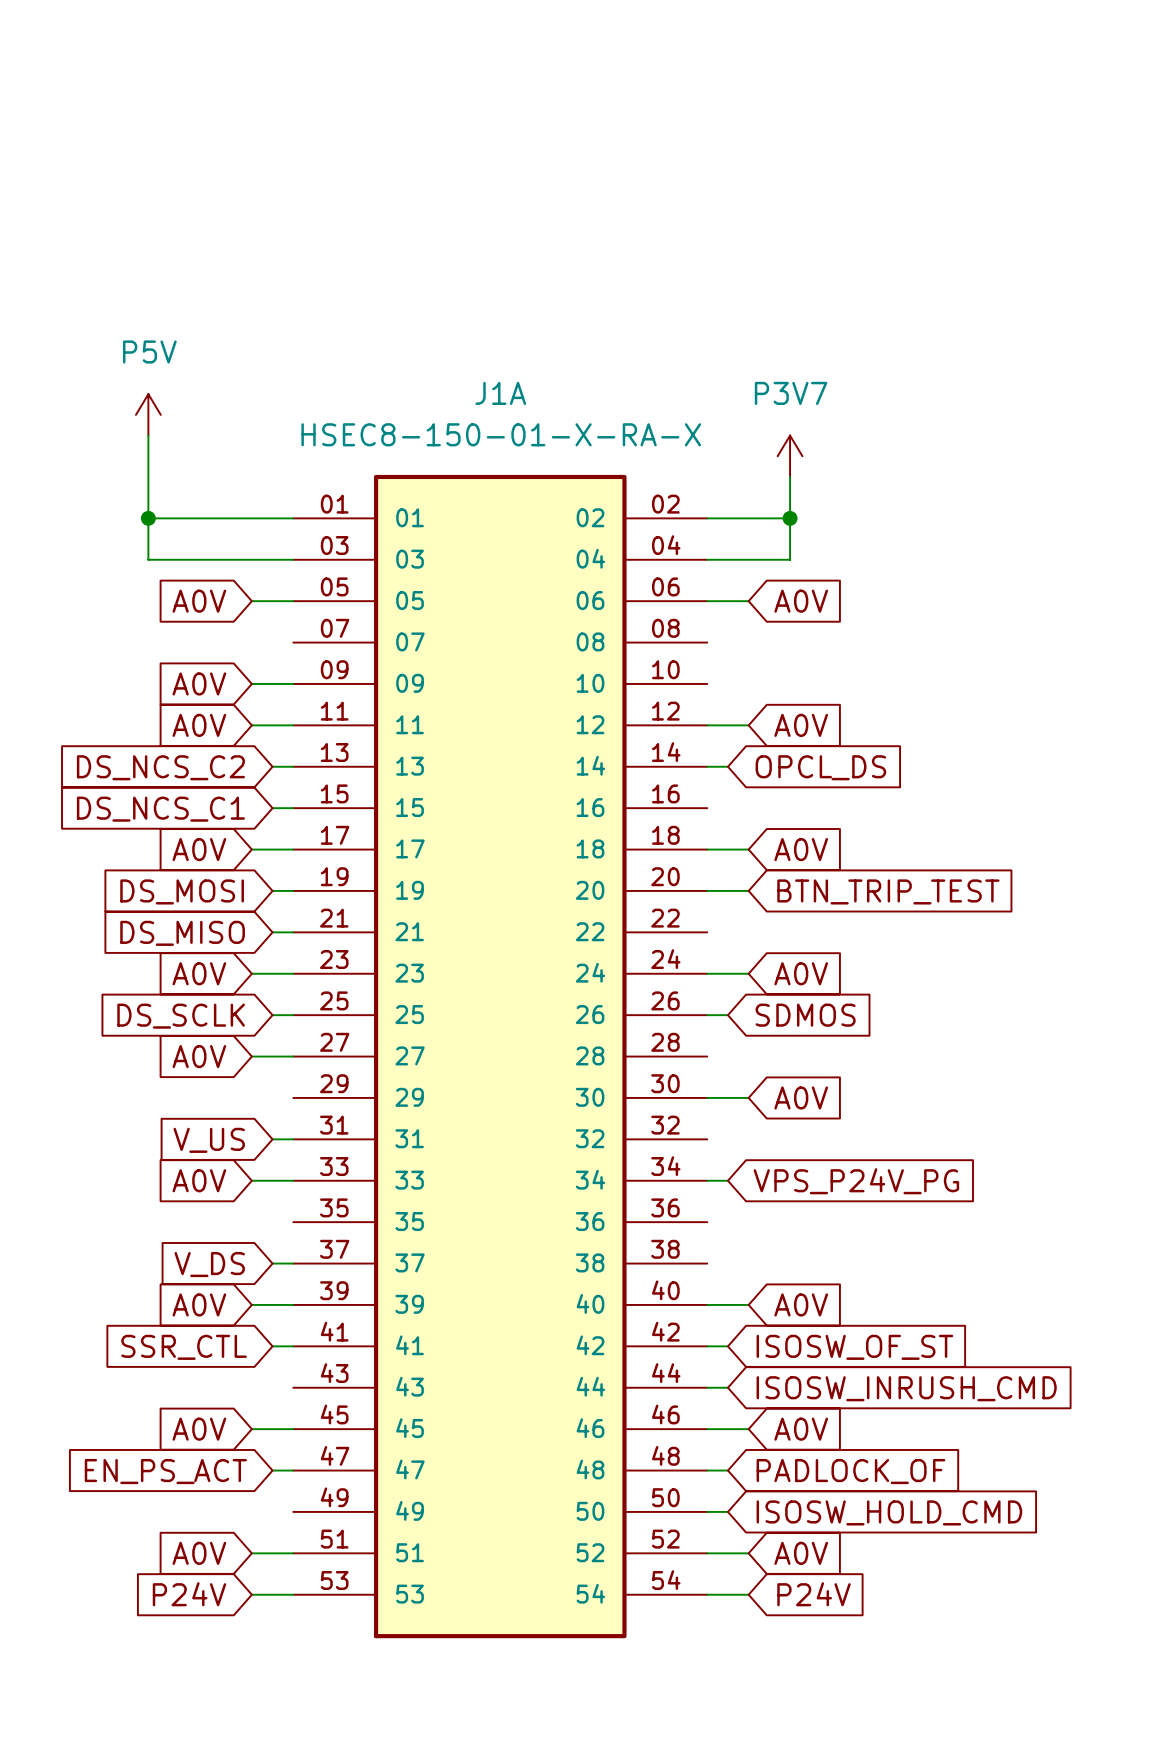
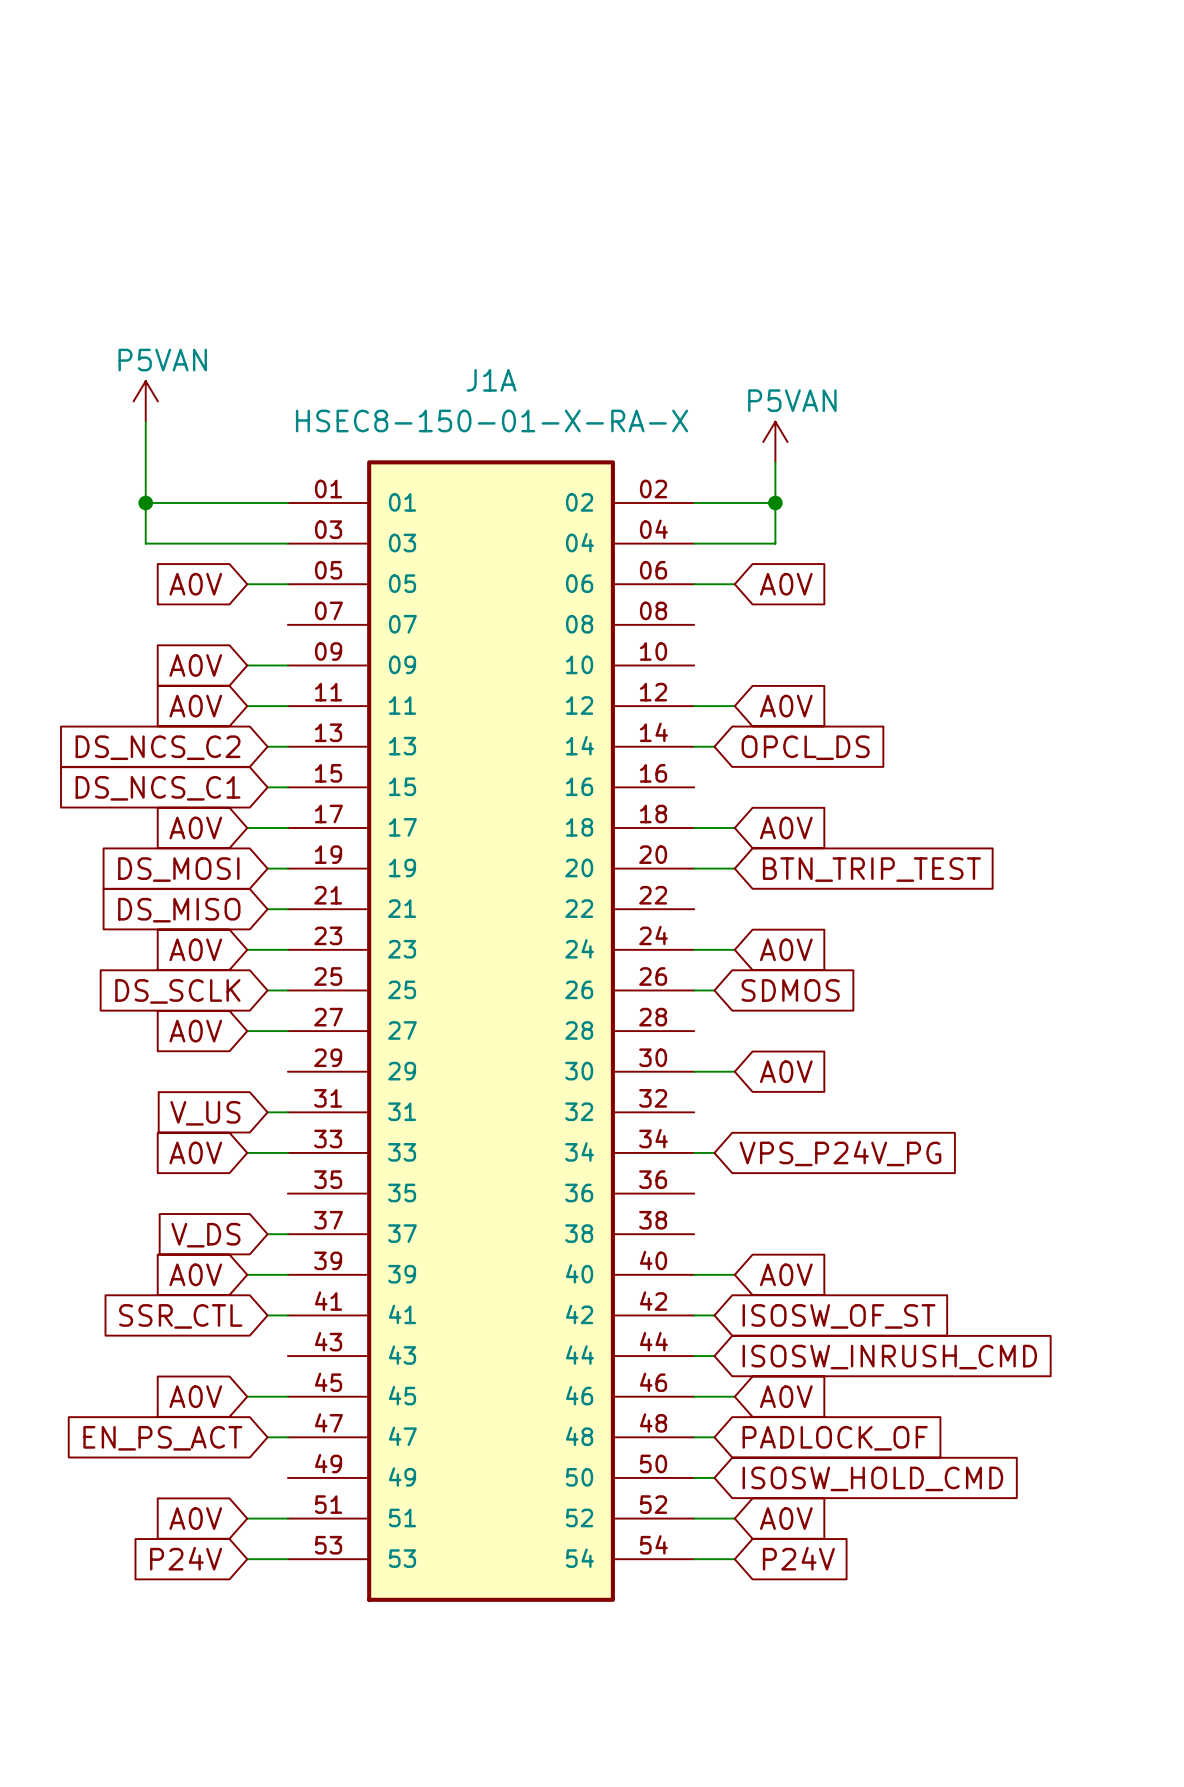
power symbol: P5V (148, 414) -> P5VAN (145, 401)
power symbol: P3V7 (790, 456) -> P5VAN (775, 442)

